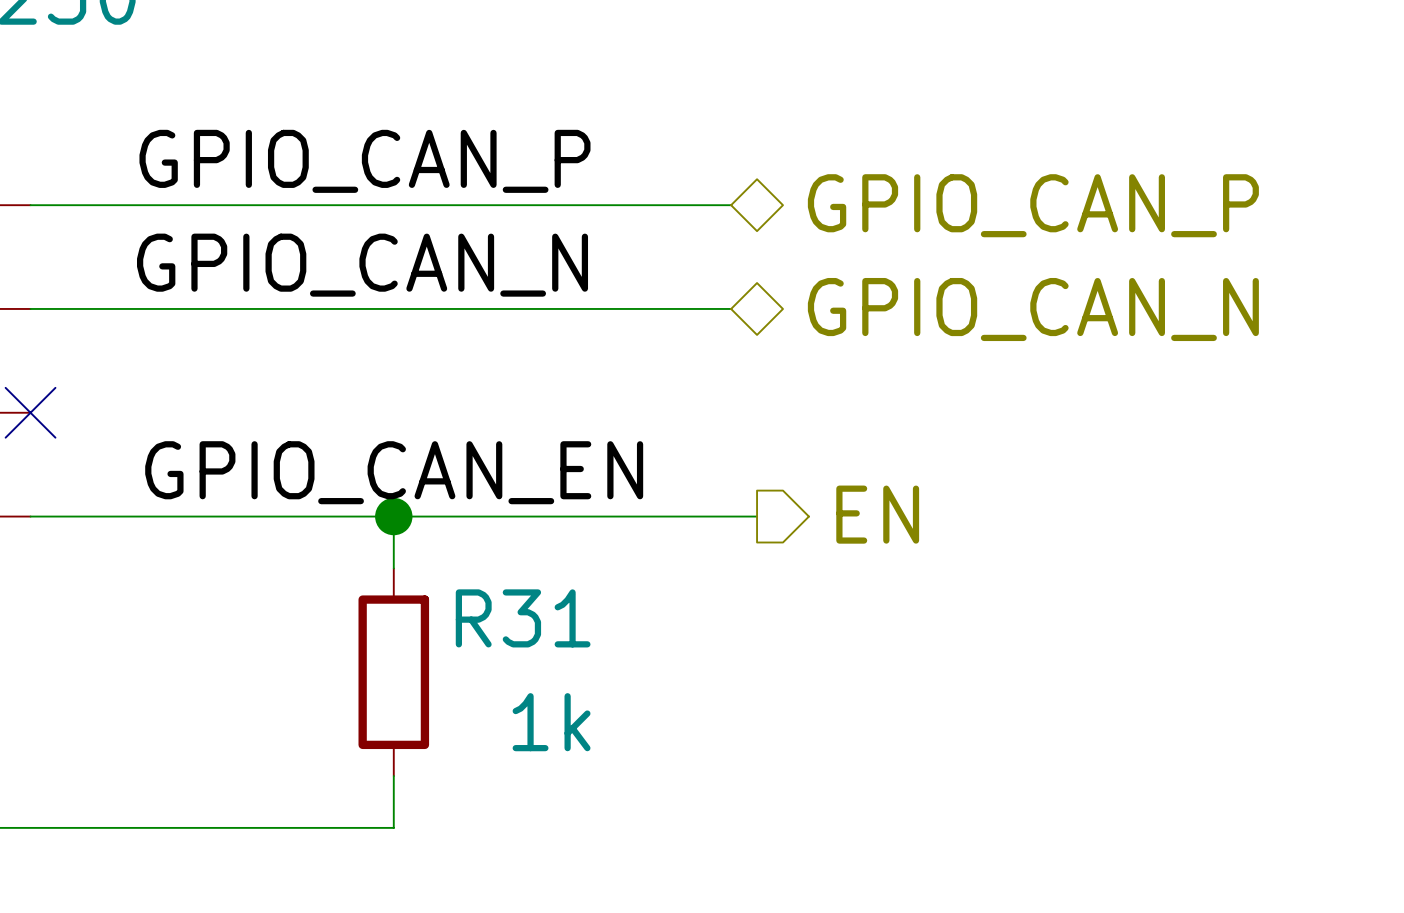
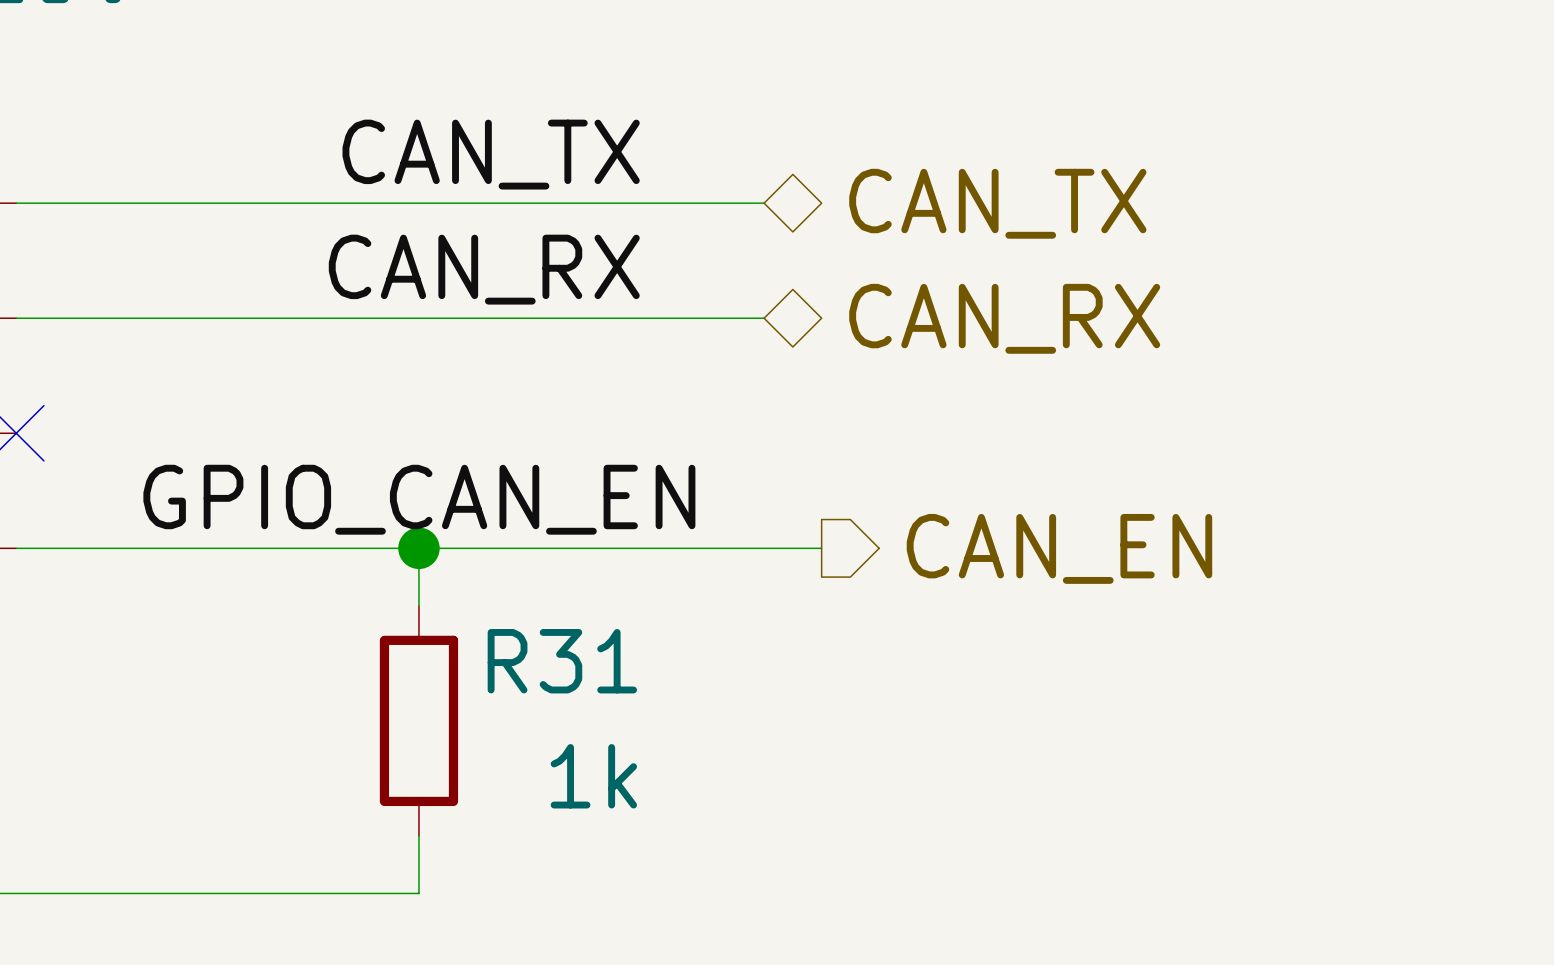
label: GPIO_CAN_P (364, 161) -> CAN_TX (491, 154)
wire: (705, 205) (731, 205) -> none
hierarchical label: GPIO_CAN_P (1033, 205) -> CAN_TX (997, 203)
label: GPIO_CAN_N (362, 265) -> CAN_RX (484, 269)
wire: (705, 308) (731, 308) -> none
hierarchical label: GPIO_CAN_N (1033, 309) -> CAN_RX (1004, 318)
hierarchical label: EN (877, 514) -> CAN_EN (1059, 548)

